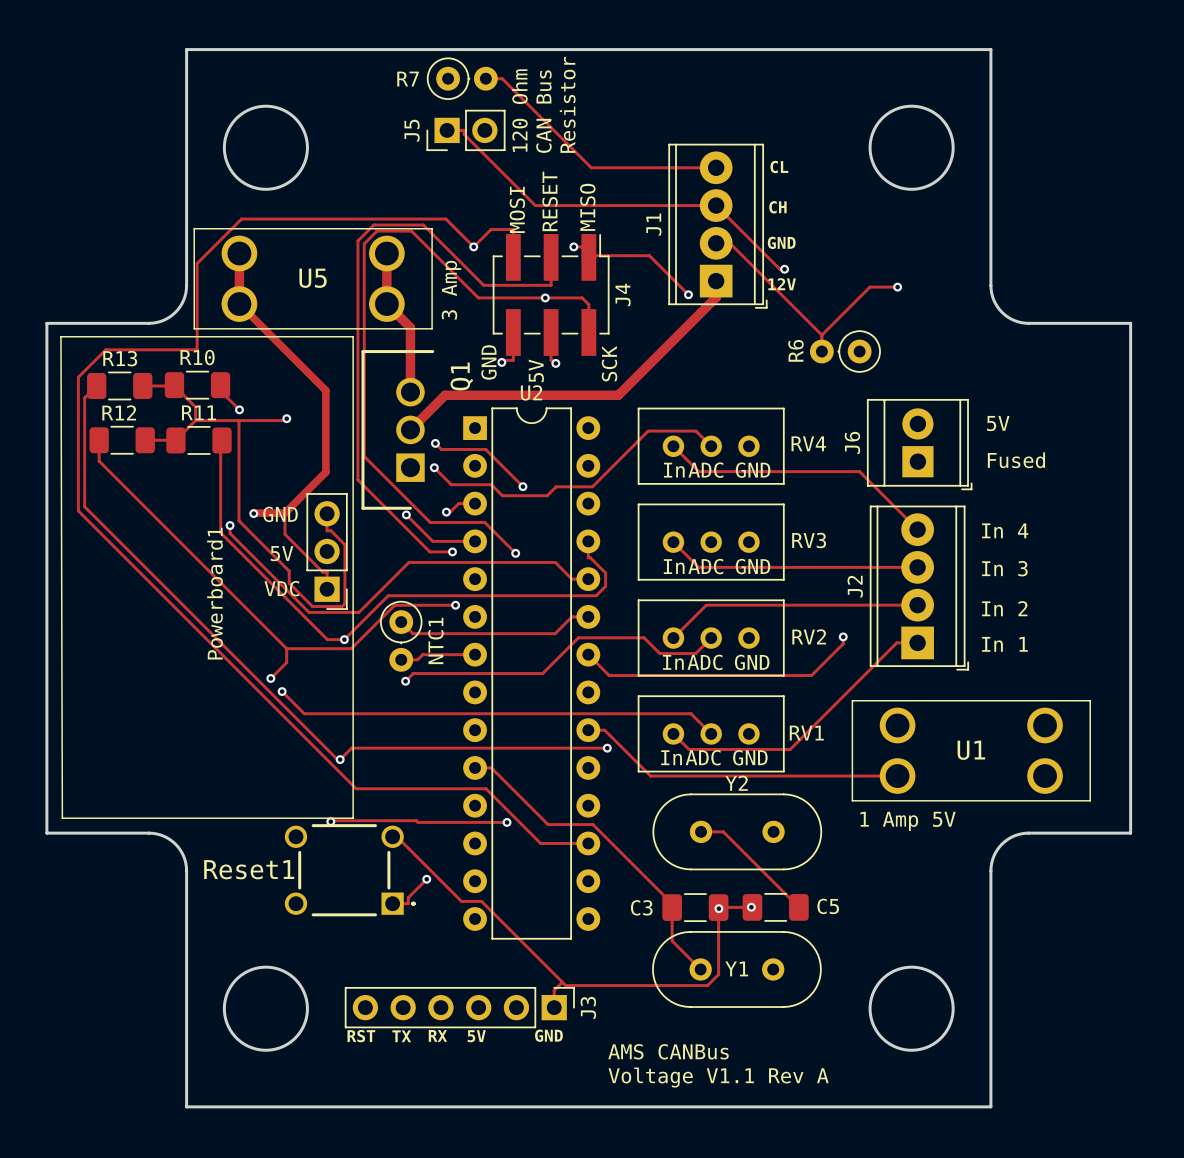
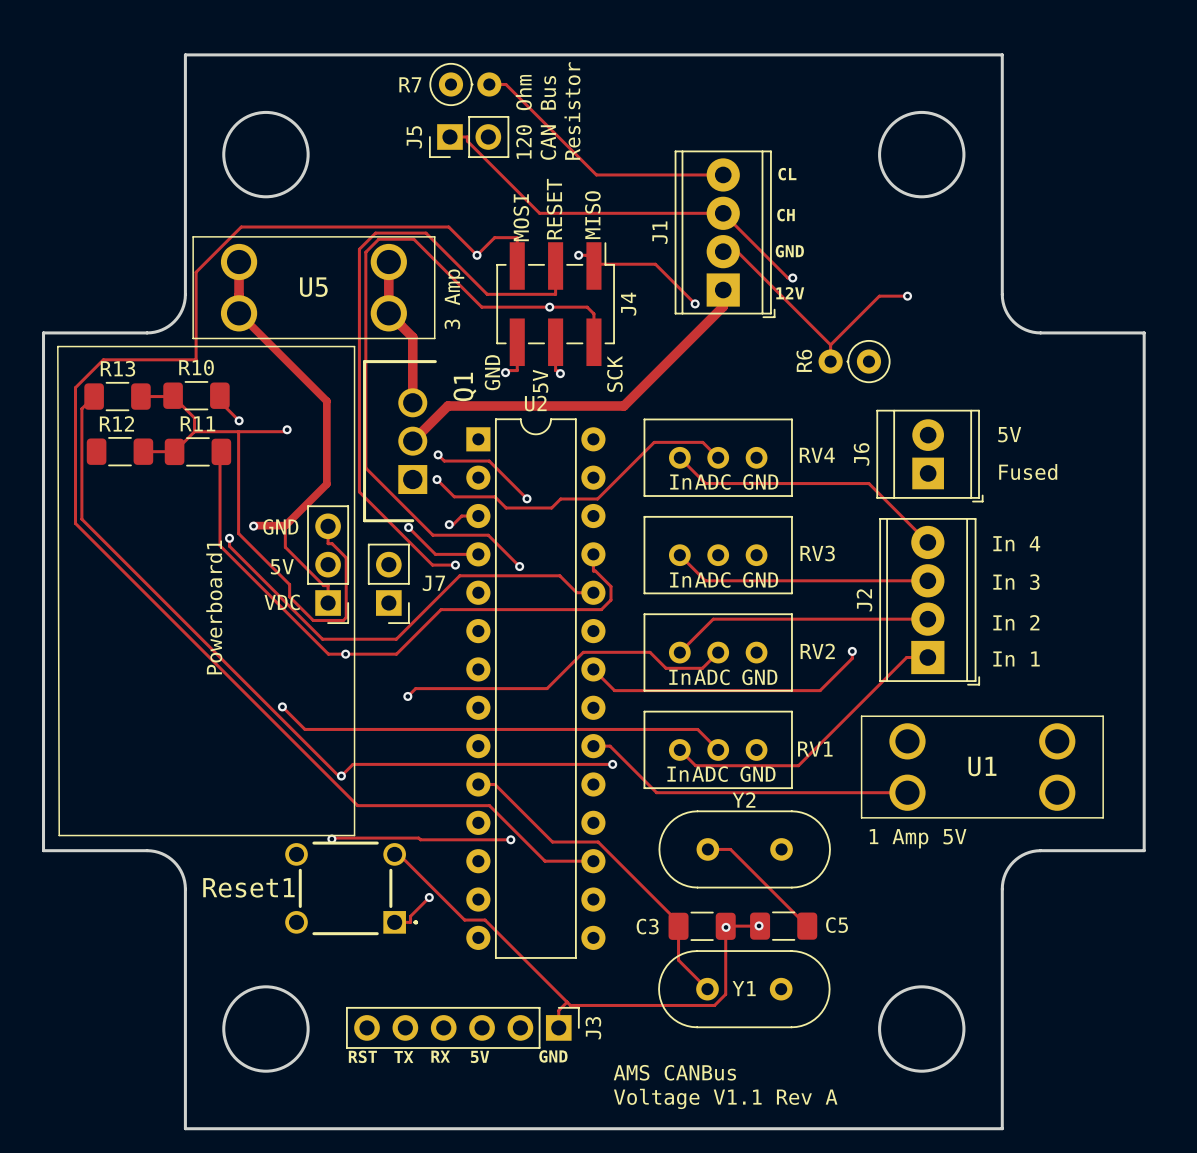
track: (99, 440) (99, 461) (286, 648) -> none
track: (456, 562) (408, 562) (358, 612) (309, 612) -> (459, 575) (396, 639) (322, 639) (309, 626)
J7: none -> (388, 583)
track: (438, 595) (388, 595) (344, 639) -> (441, 609) (396, 654) (345, 654)
track: (455, 605) (394, 605) (351, 648) (286, 648) -> none
via: (455, 605) -> none
track: (588, 616) (571, 616) (555, 633) (412, 633) (401, 622) -> none
NTC1: (401, 636) -> none
track: (286, 648) (286, 662) (270, 678) -> none
track: (475, 654) (422, 654) (417, 659) (401, 659) -> none
via: (270, 678) -> none

